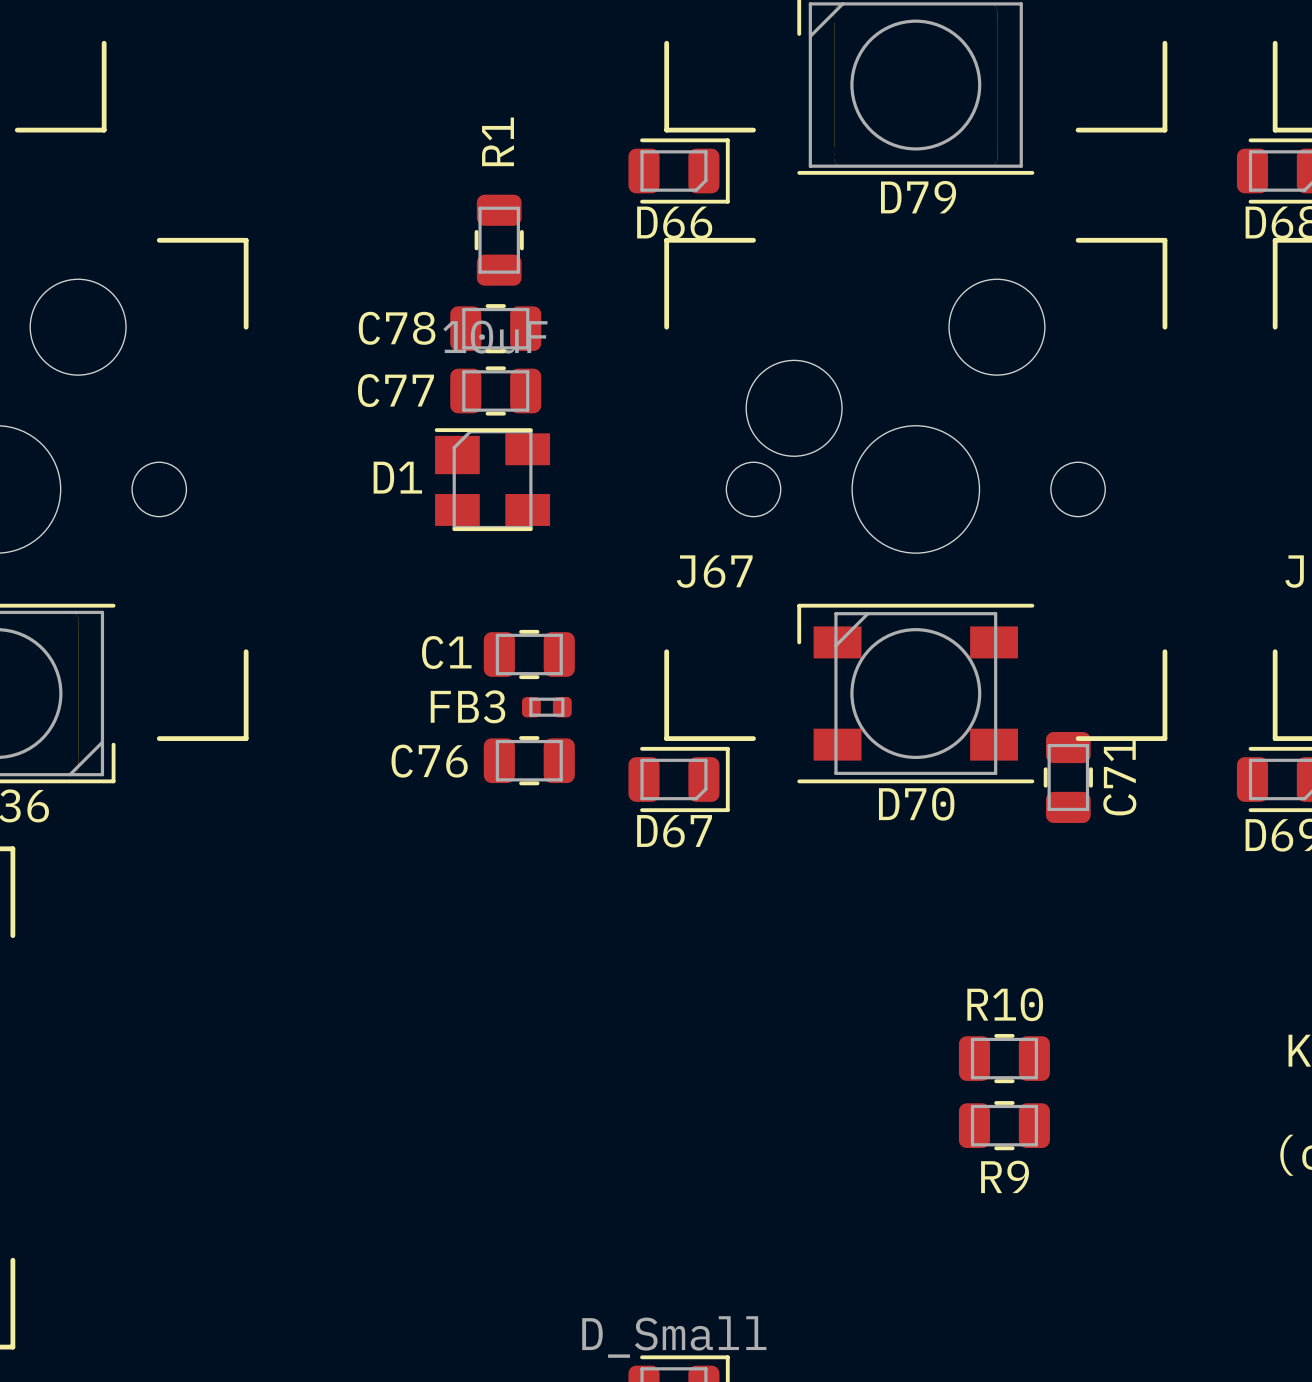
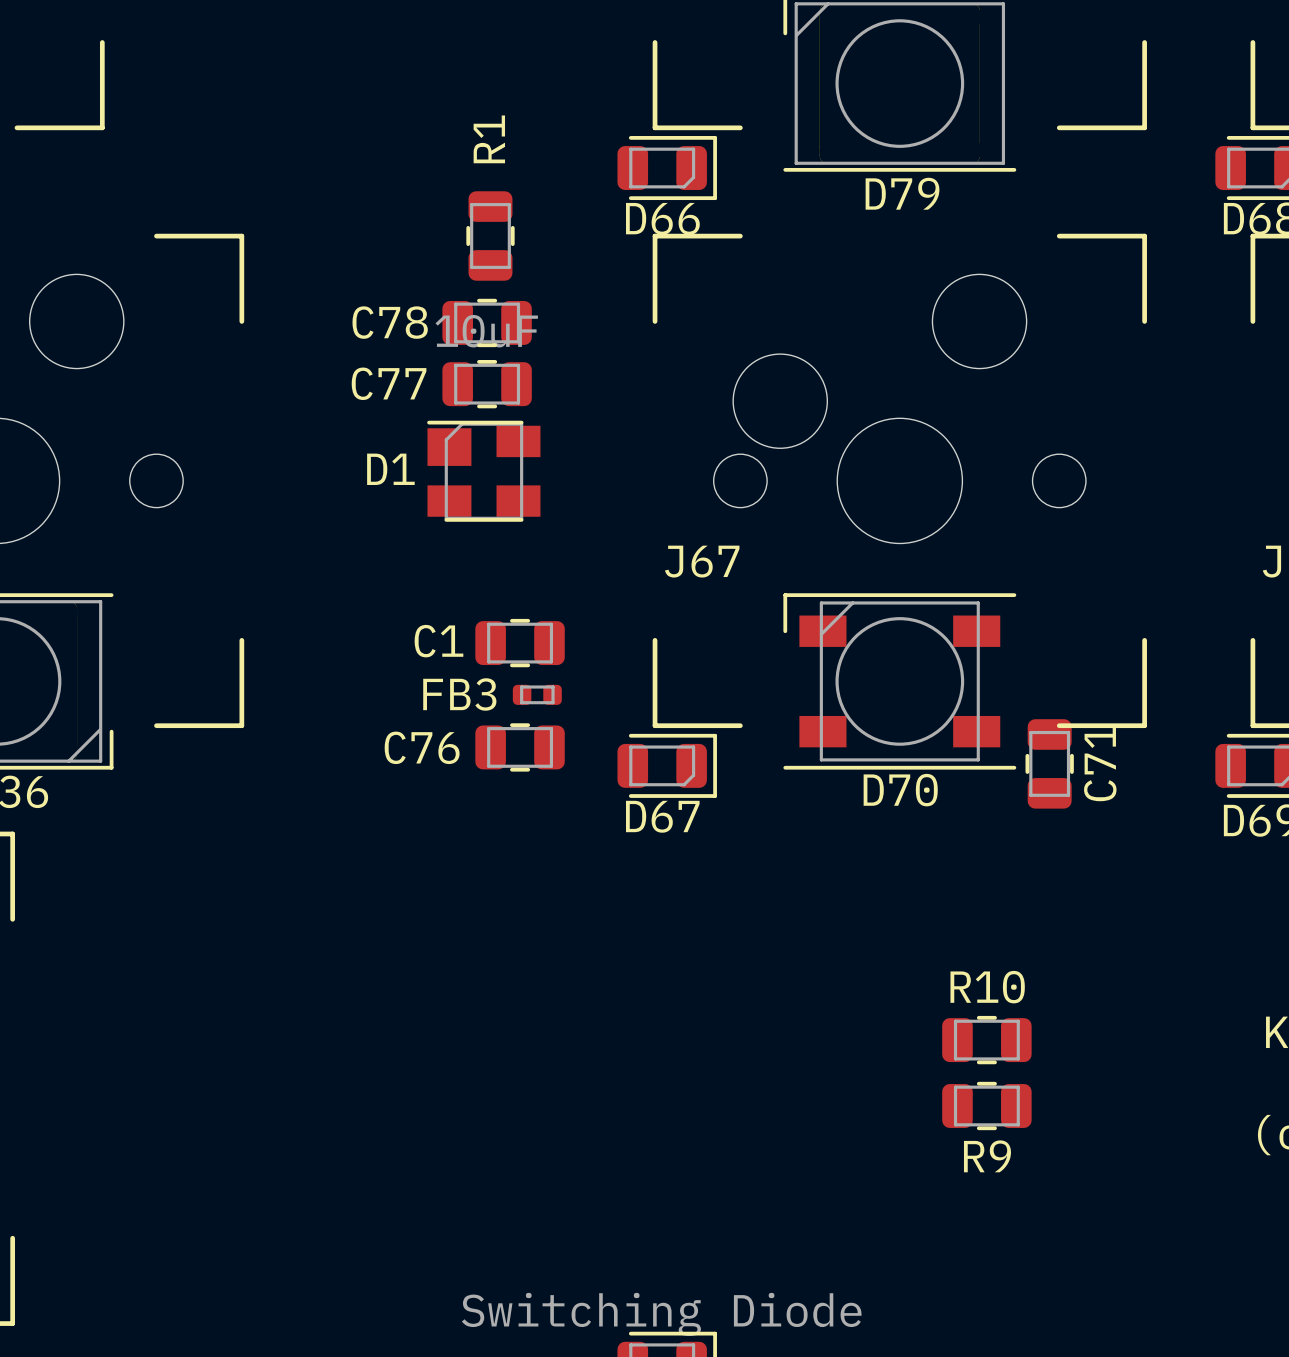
part value: D_Small (674, 1336) -> Switching Diode (661, 1314)

